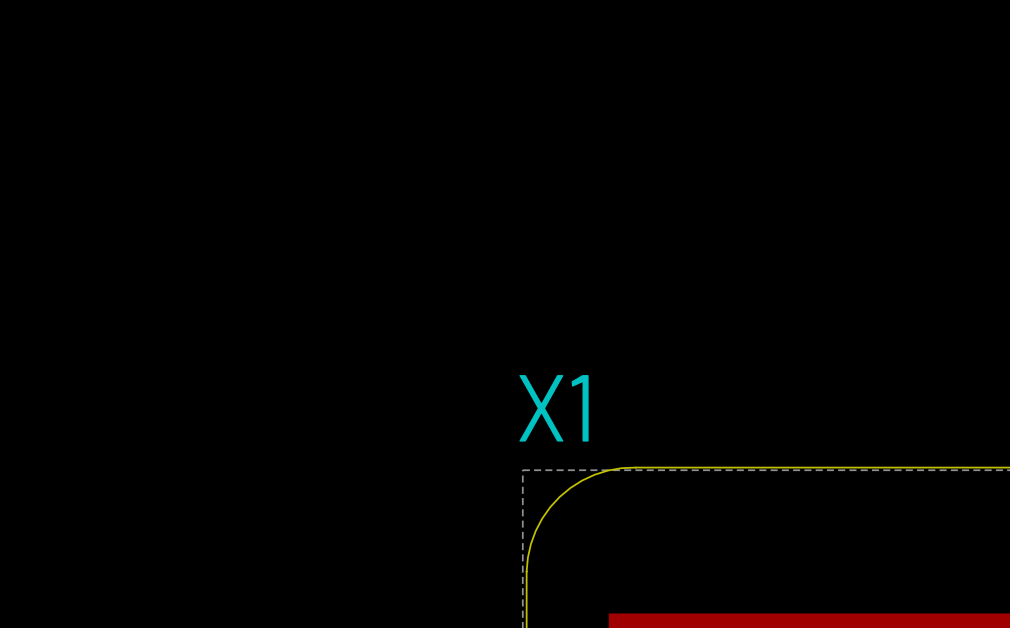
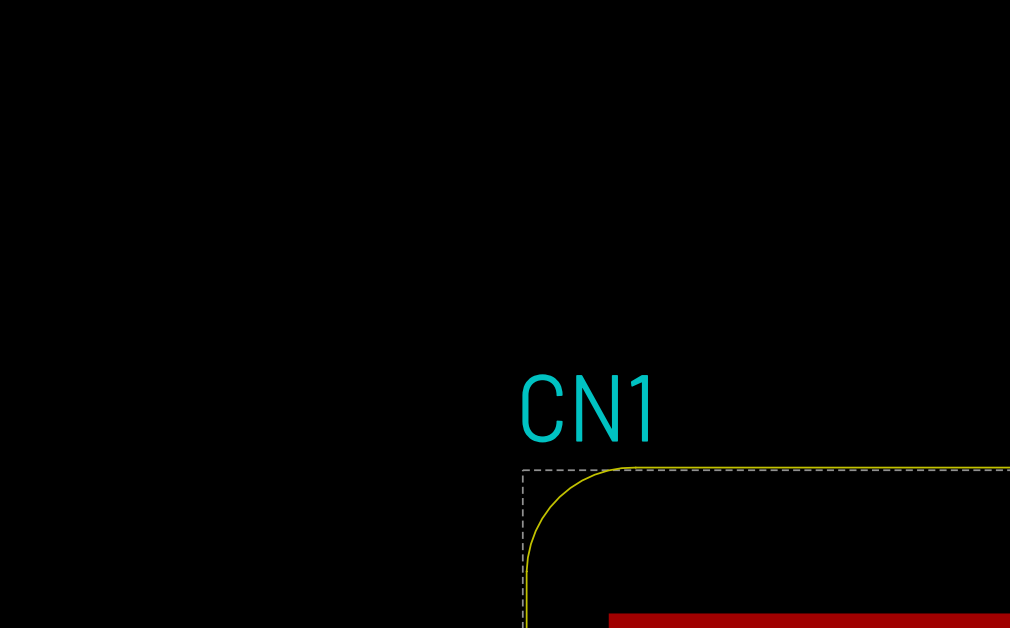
X1 name: X1 (554, 408) -> CN1 (585, 408)

